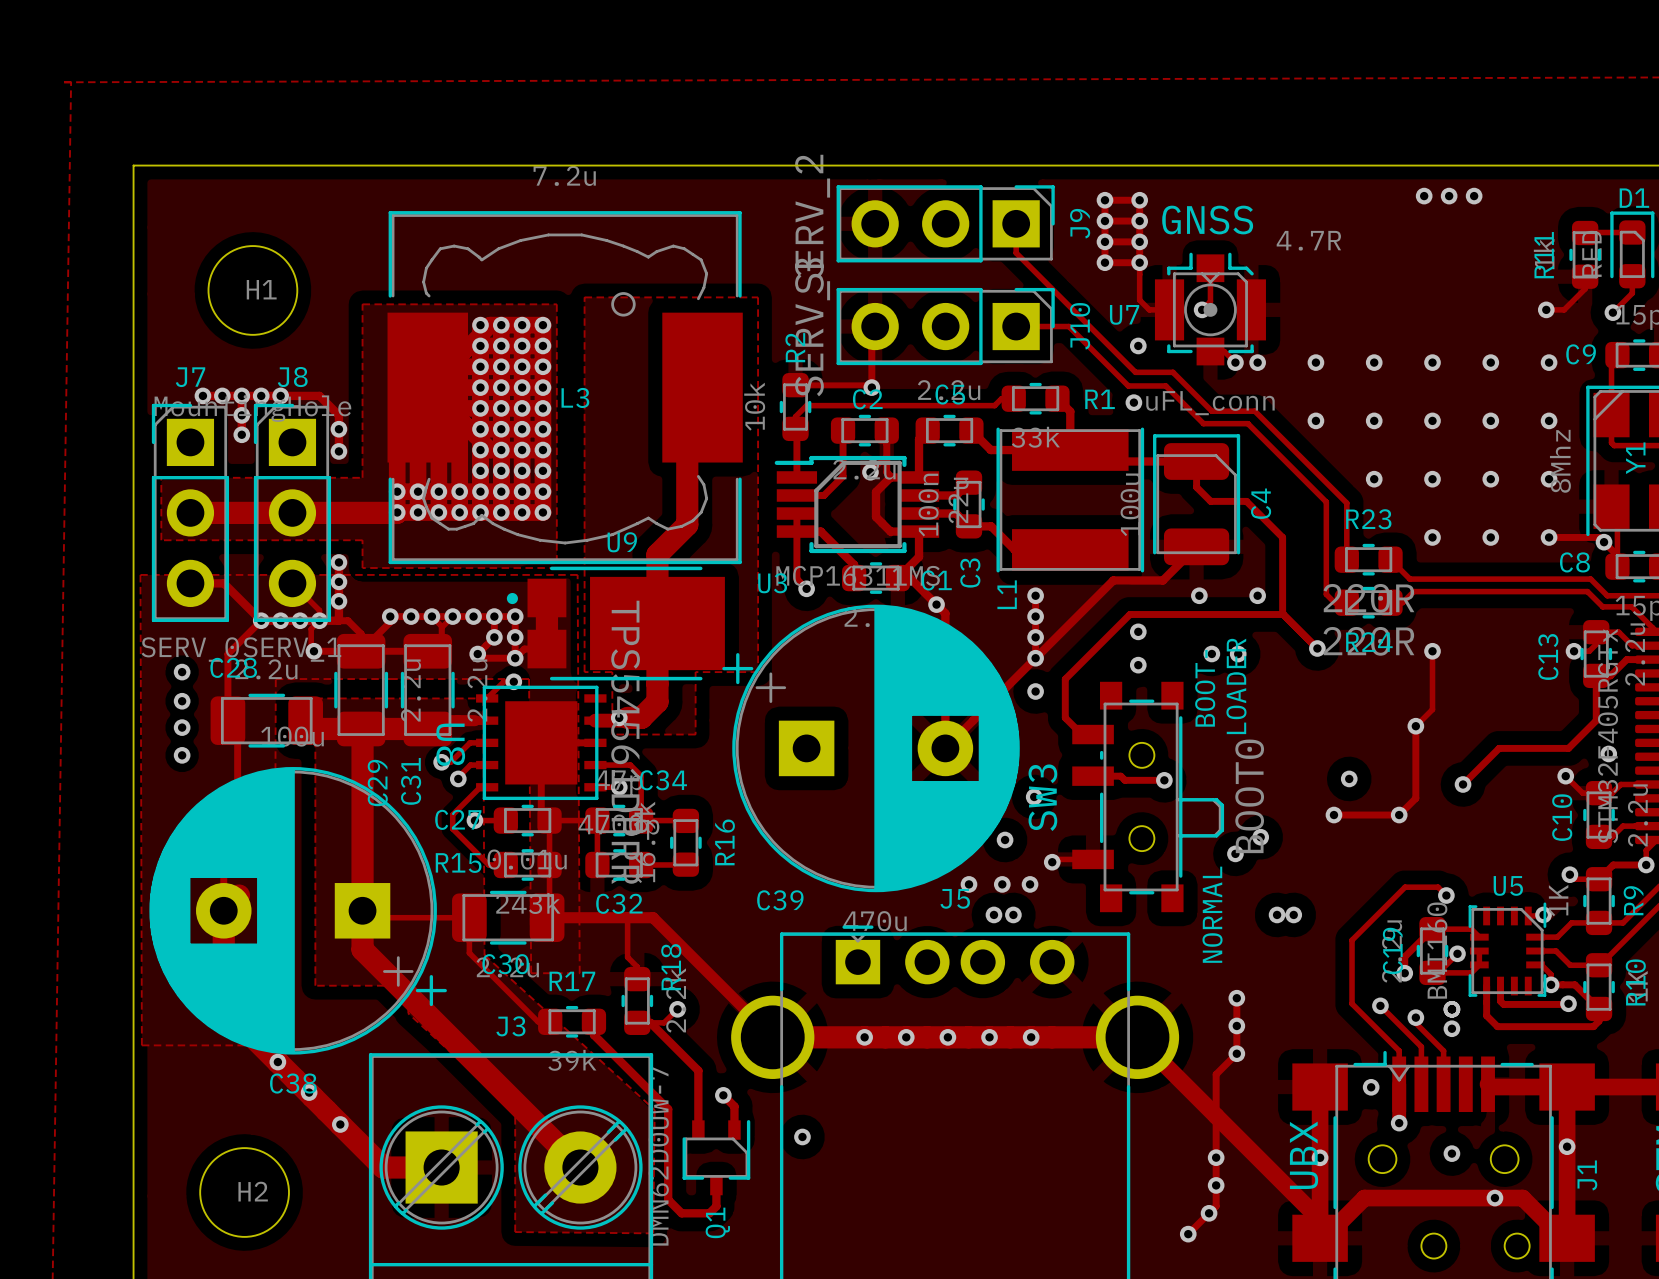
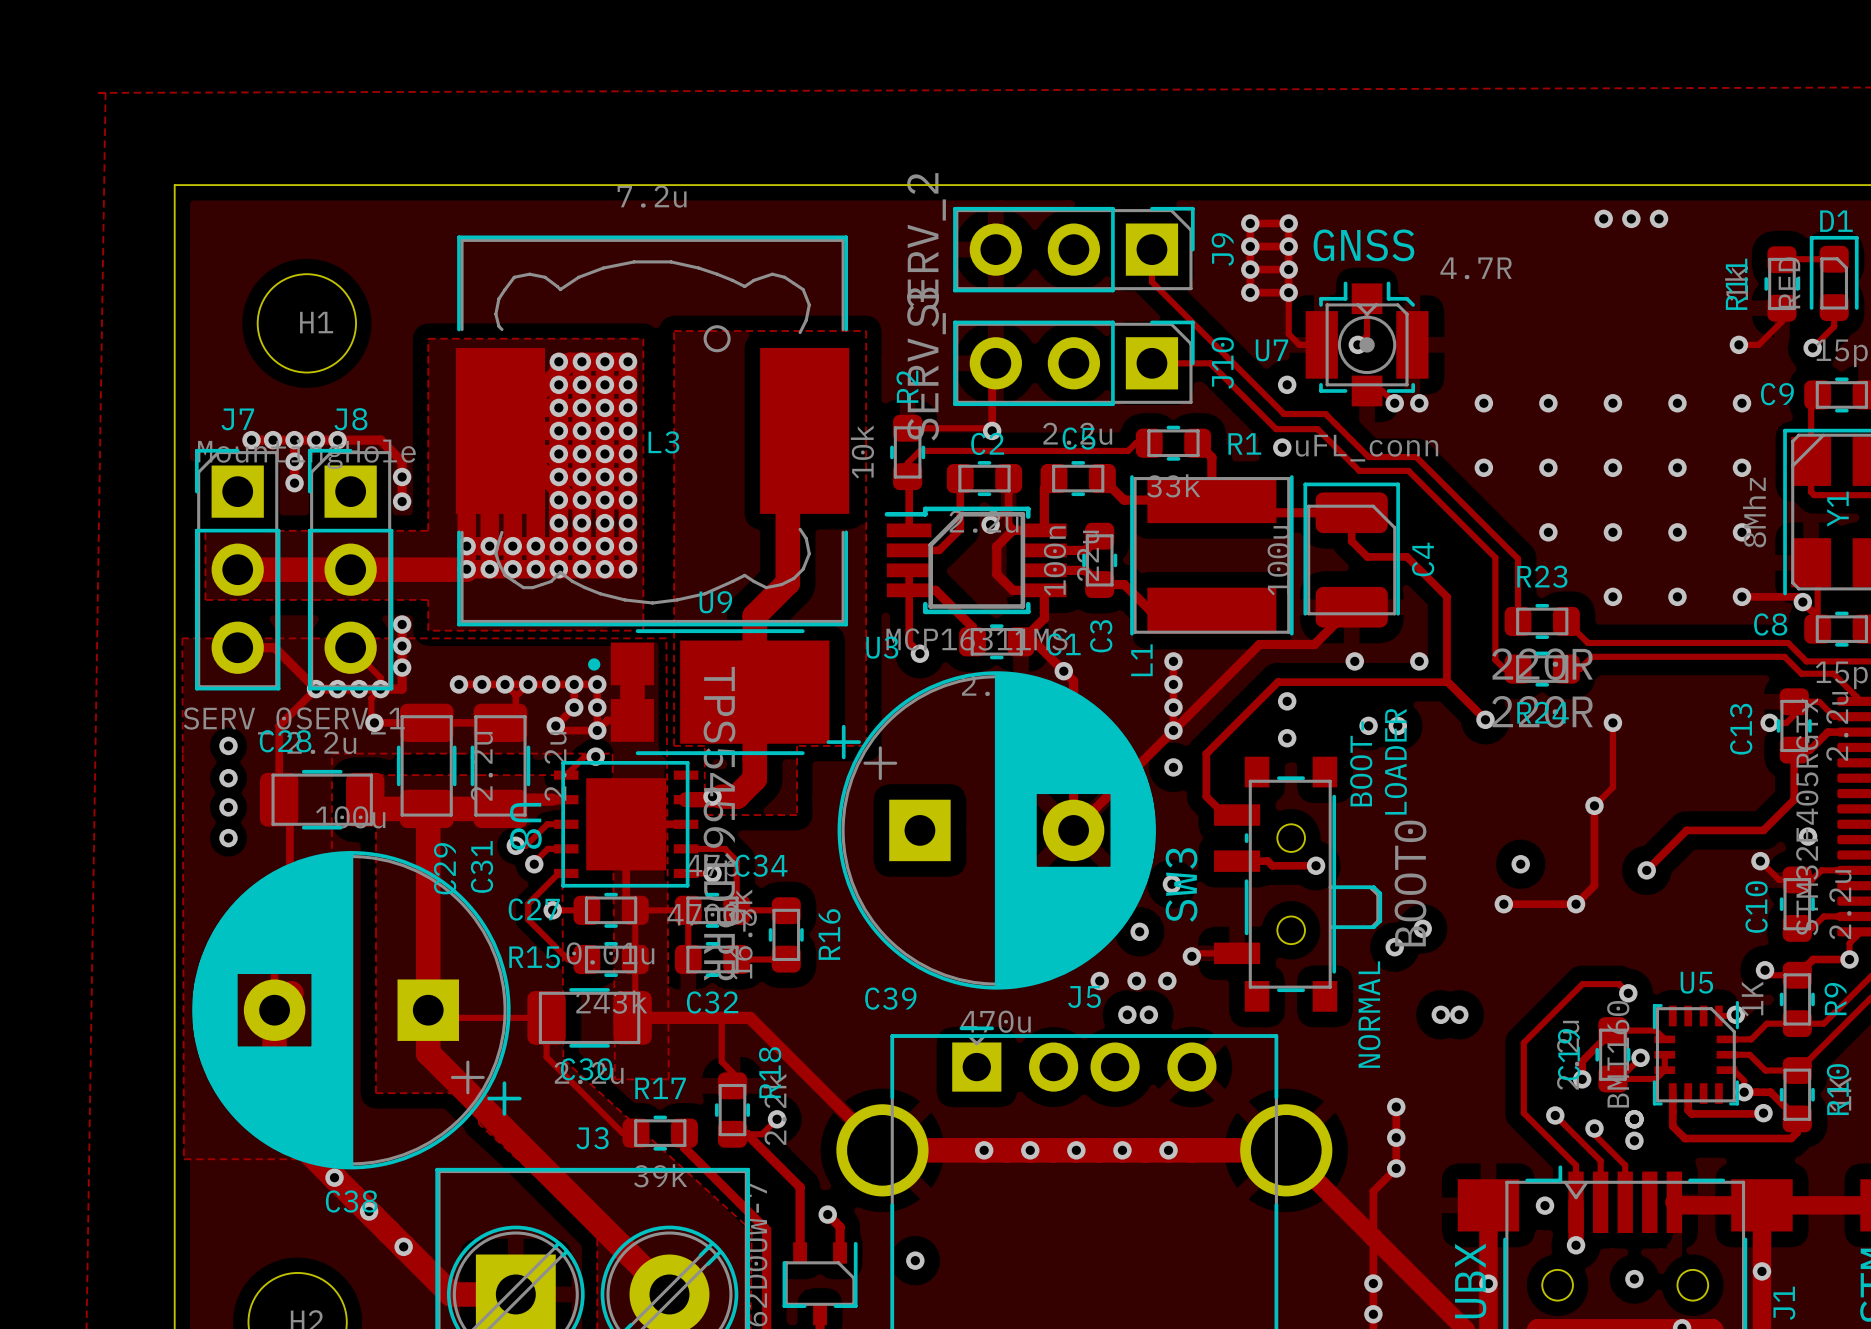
track: (390, 616) (390, 622) (361, 651) (361, 633) (347, 620) (338, 620) -> none

